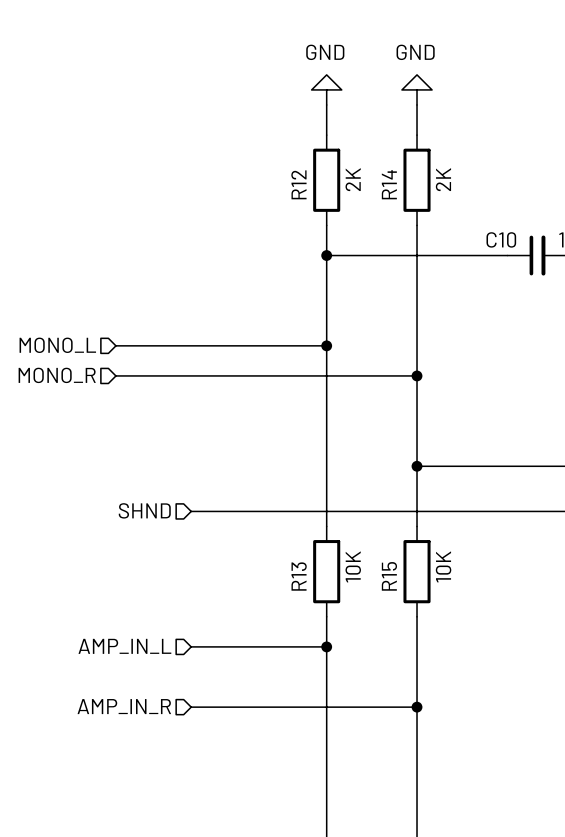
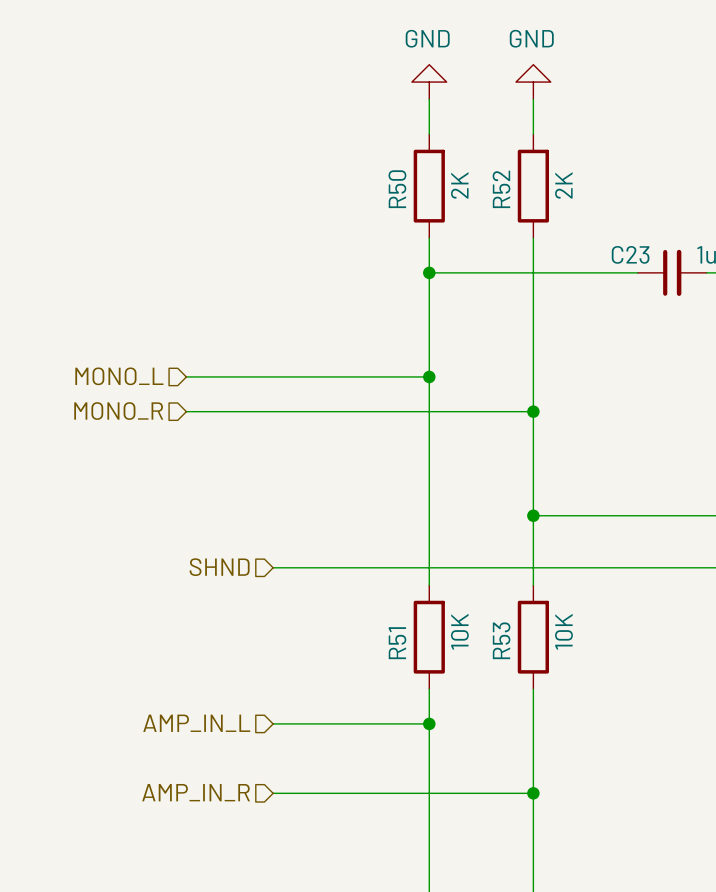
R12 name: R12 (298, 184) -> R50 (397, 189)
R14 name: R14 (389, 184) -> R52 (501, 189)
C10 name: C10 (501, 239) -> C23 (630, 254)
R13 name: R13 (299, 576) -> R51 (397, 643)
R15 name: R15 (389, 576) -> R53 (501, 640)

